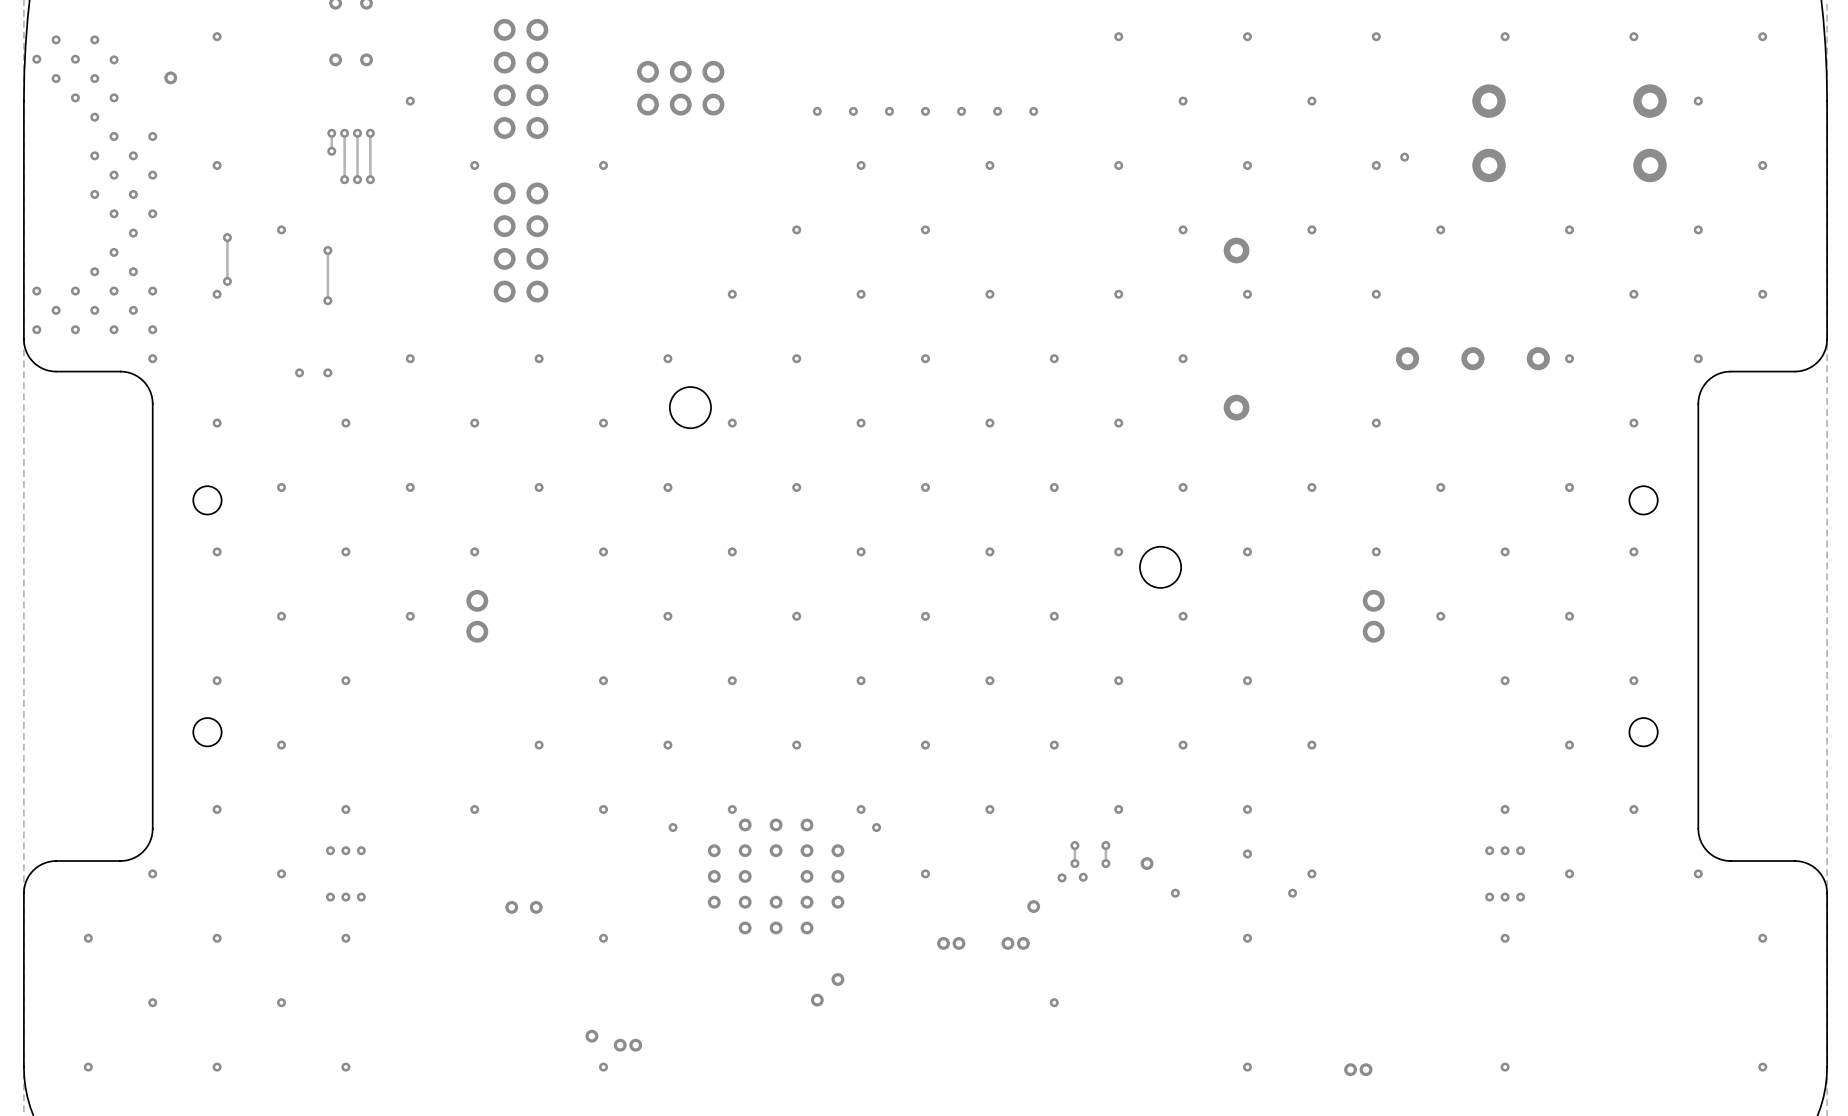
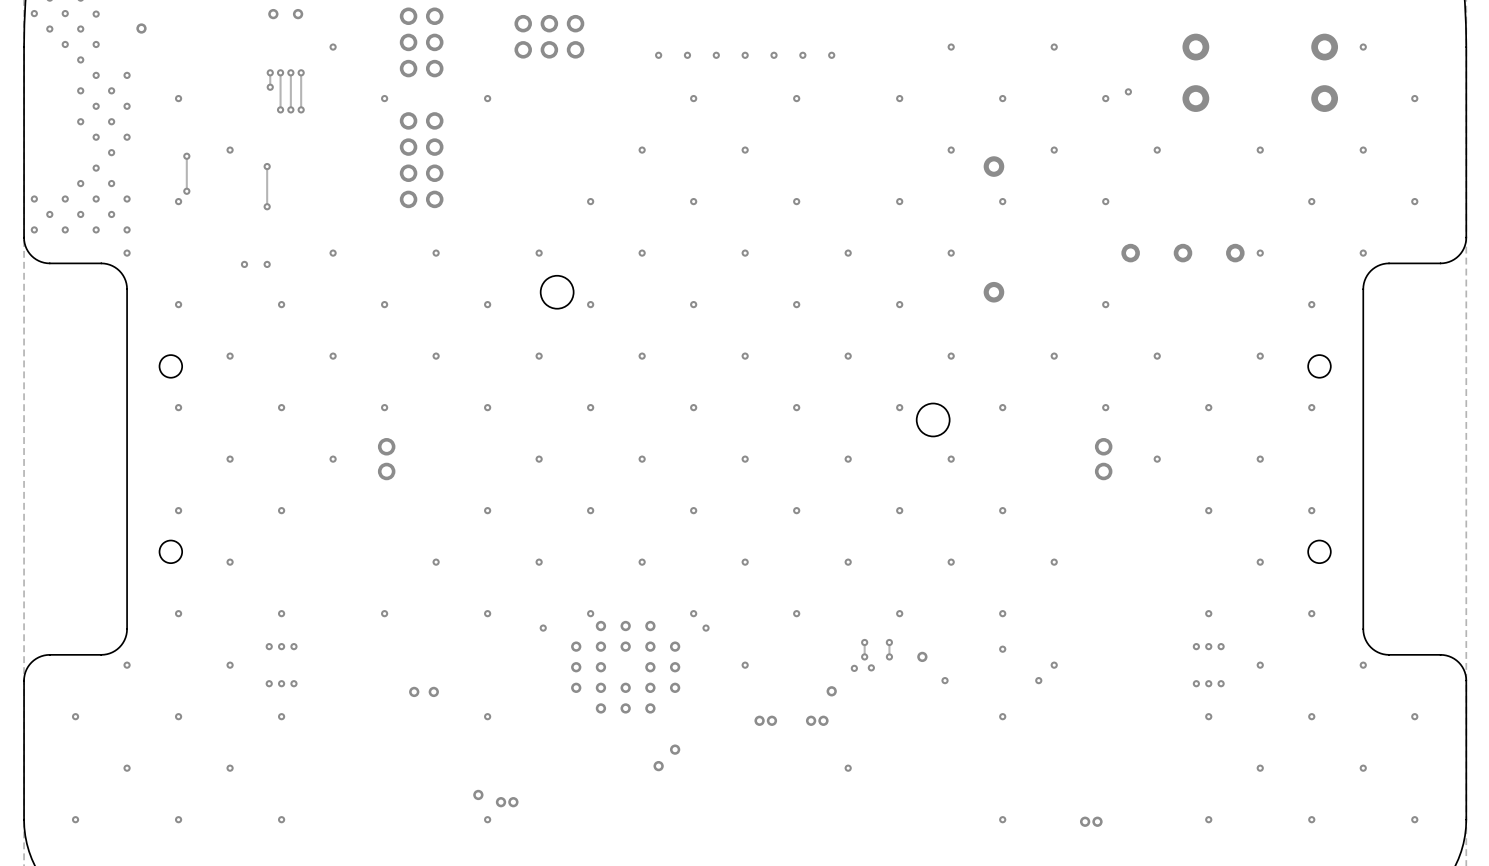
via: none -> (1311, 716)
via: none -> (1260, 768)
via: none -> (1363, 768)
via: none -> (1311, 819)

